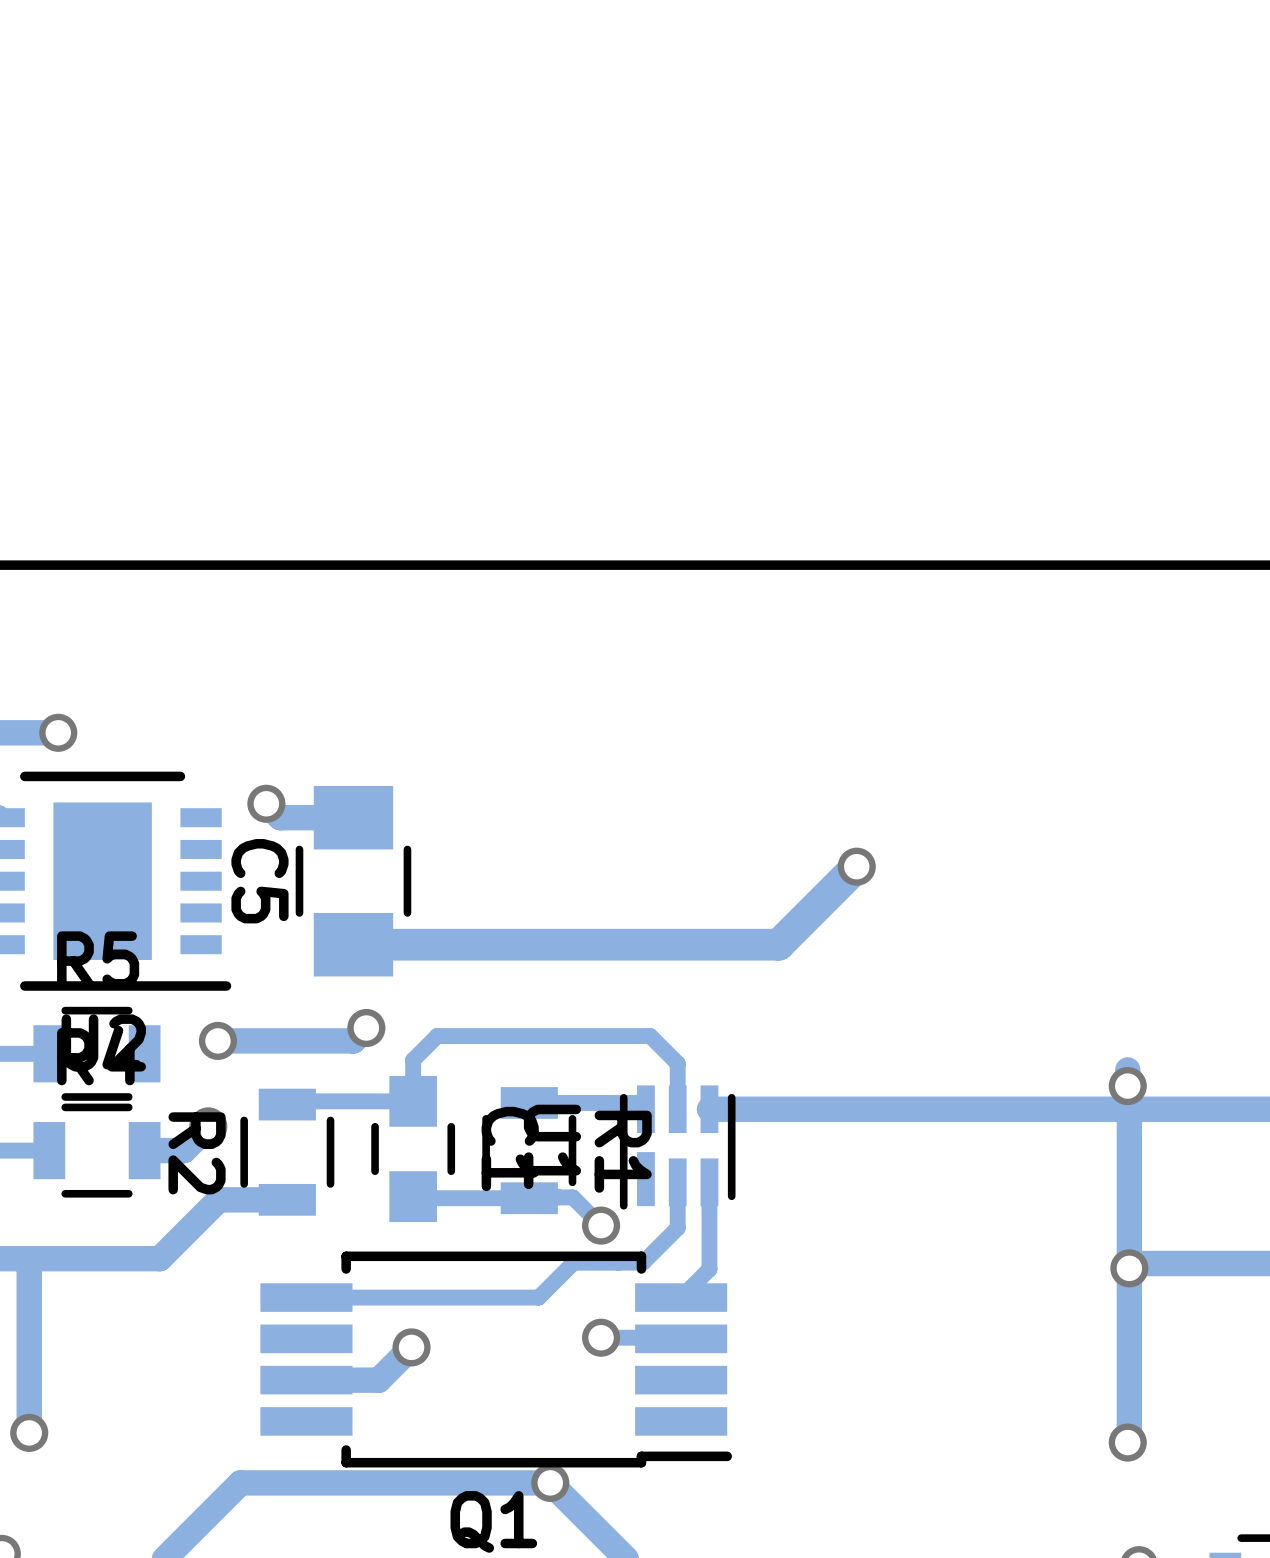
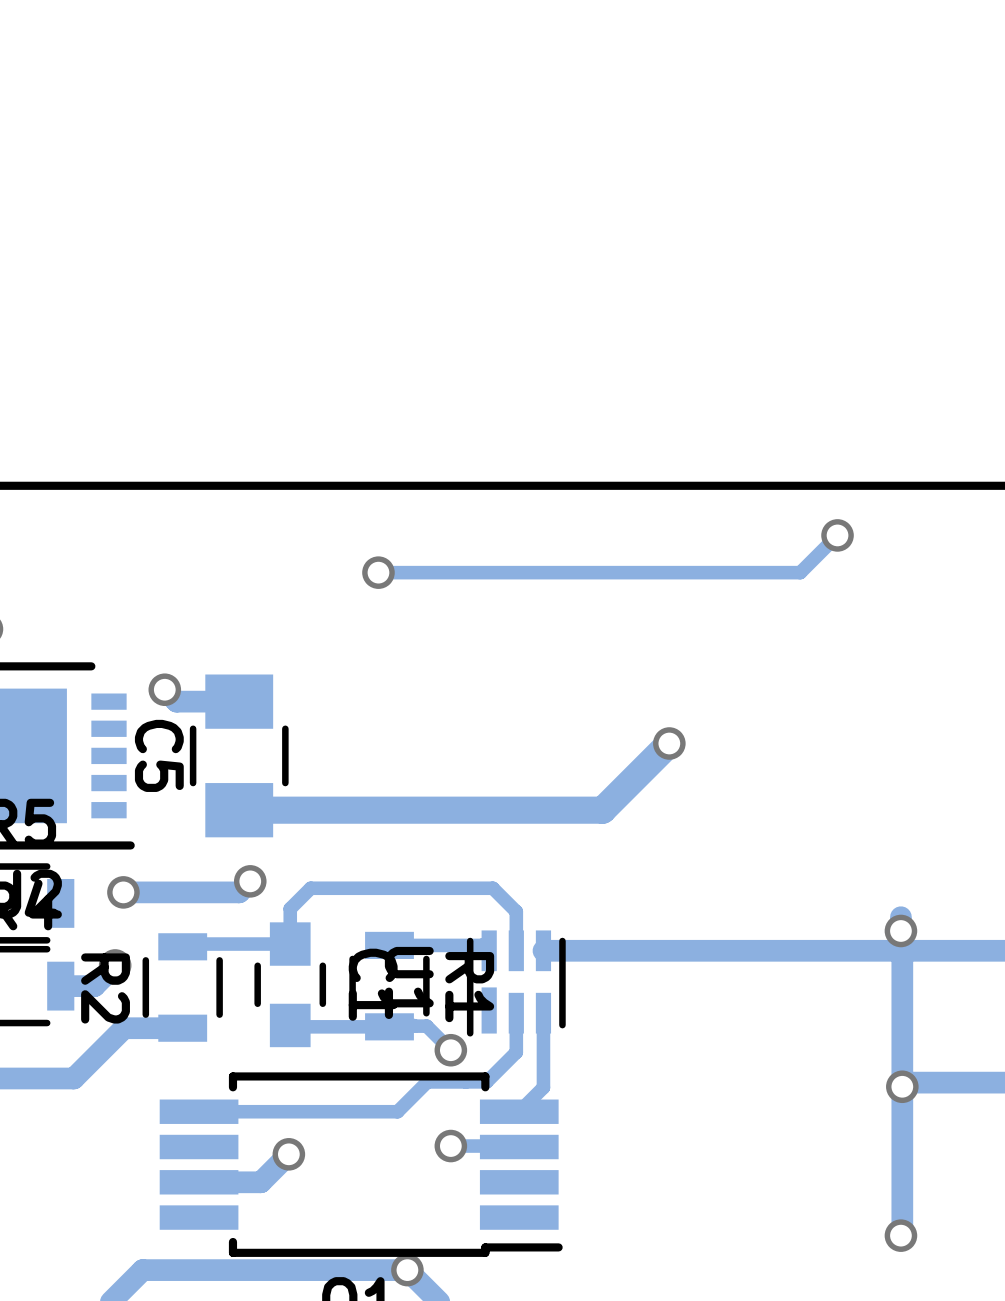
track: none -> (837, 535) (800, 572) (378, 572)
via: none -> (837, 535)
via: none -> (378, 572)

